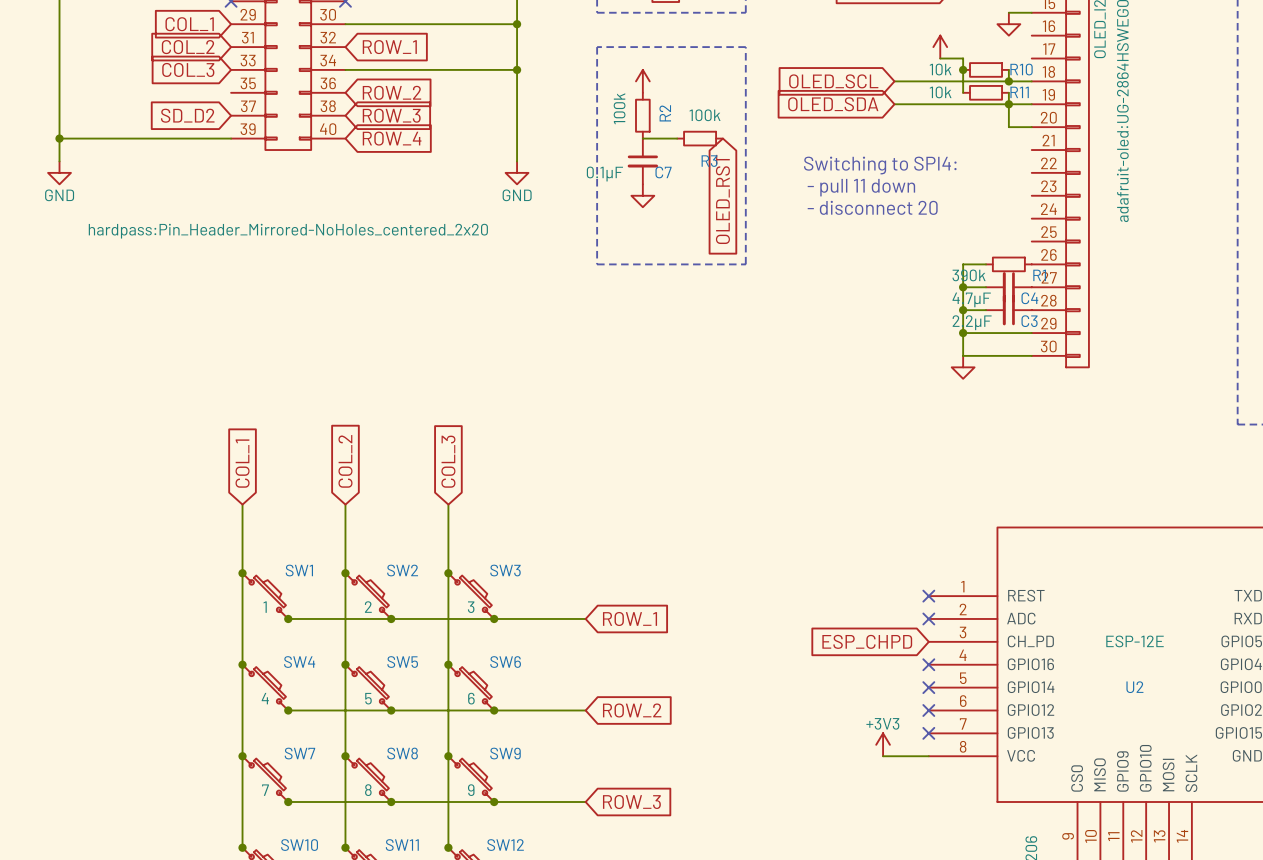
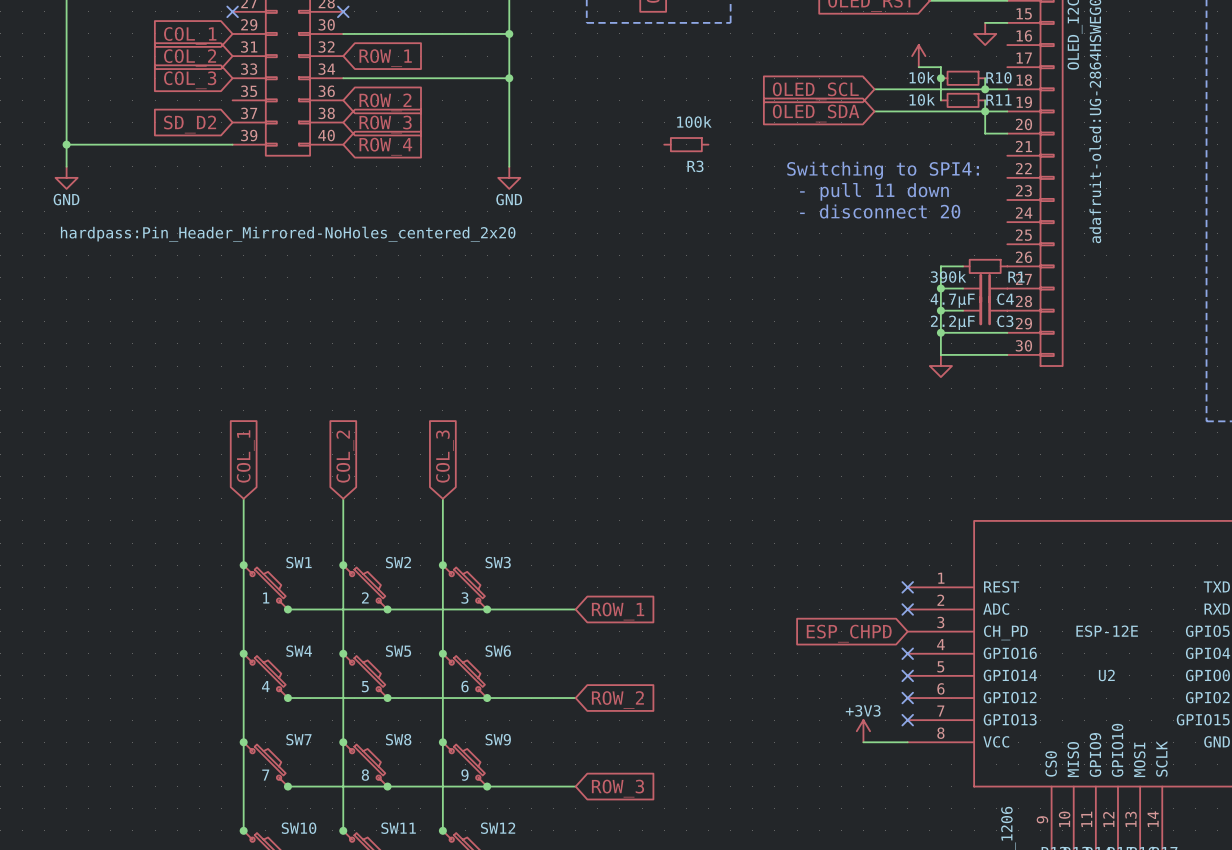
line: (597, 47) (597, 264) (745, 264) (745, 47) (597, 47) -> none
power symbol: (642, 81) -> none
R2: 100k (642, 115) -> none
wire: (642, 138) (677, 138) -> none
C7: 0.1µF (642, 161) -> none
power symbol: (642, 195) -> none
global label: OLED_RST (722, 199) -> none

